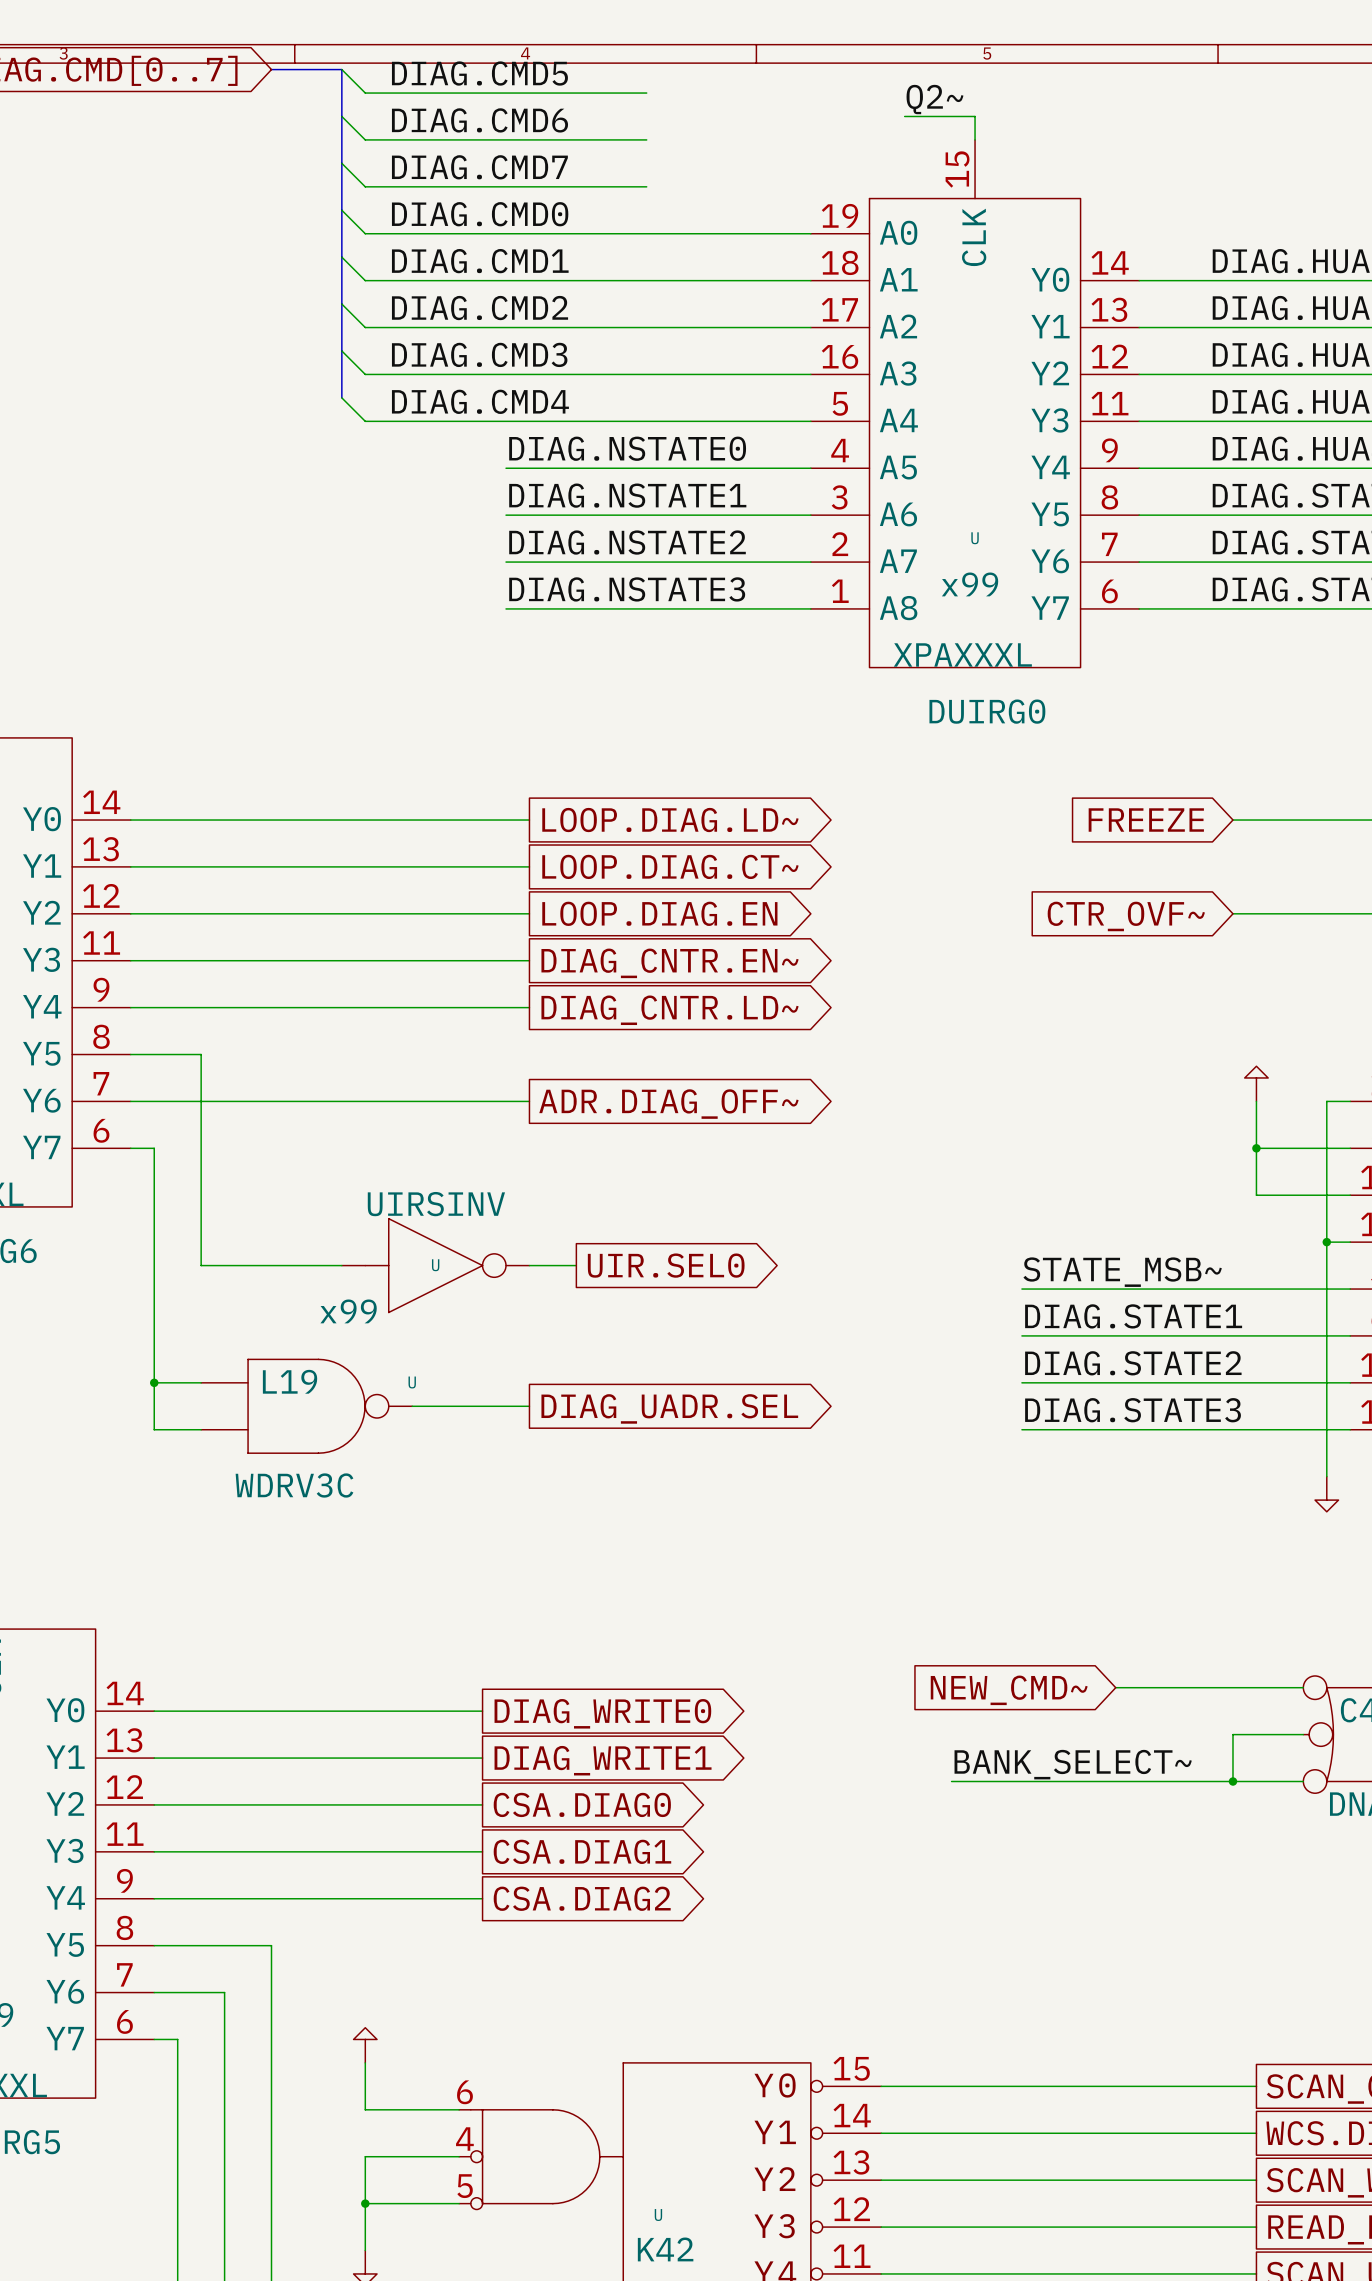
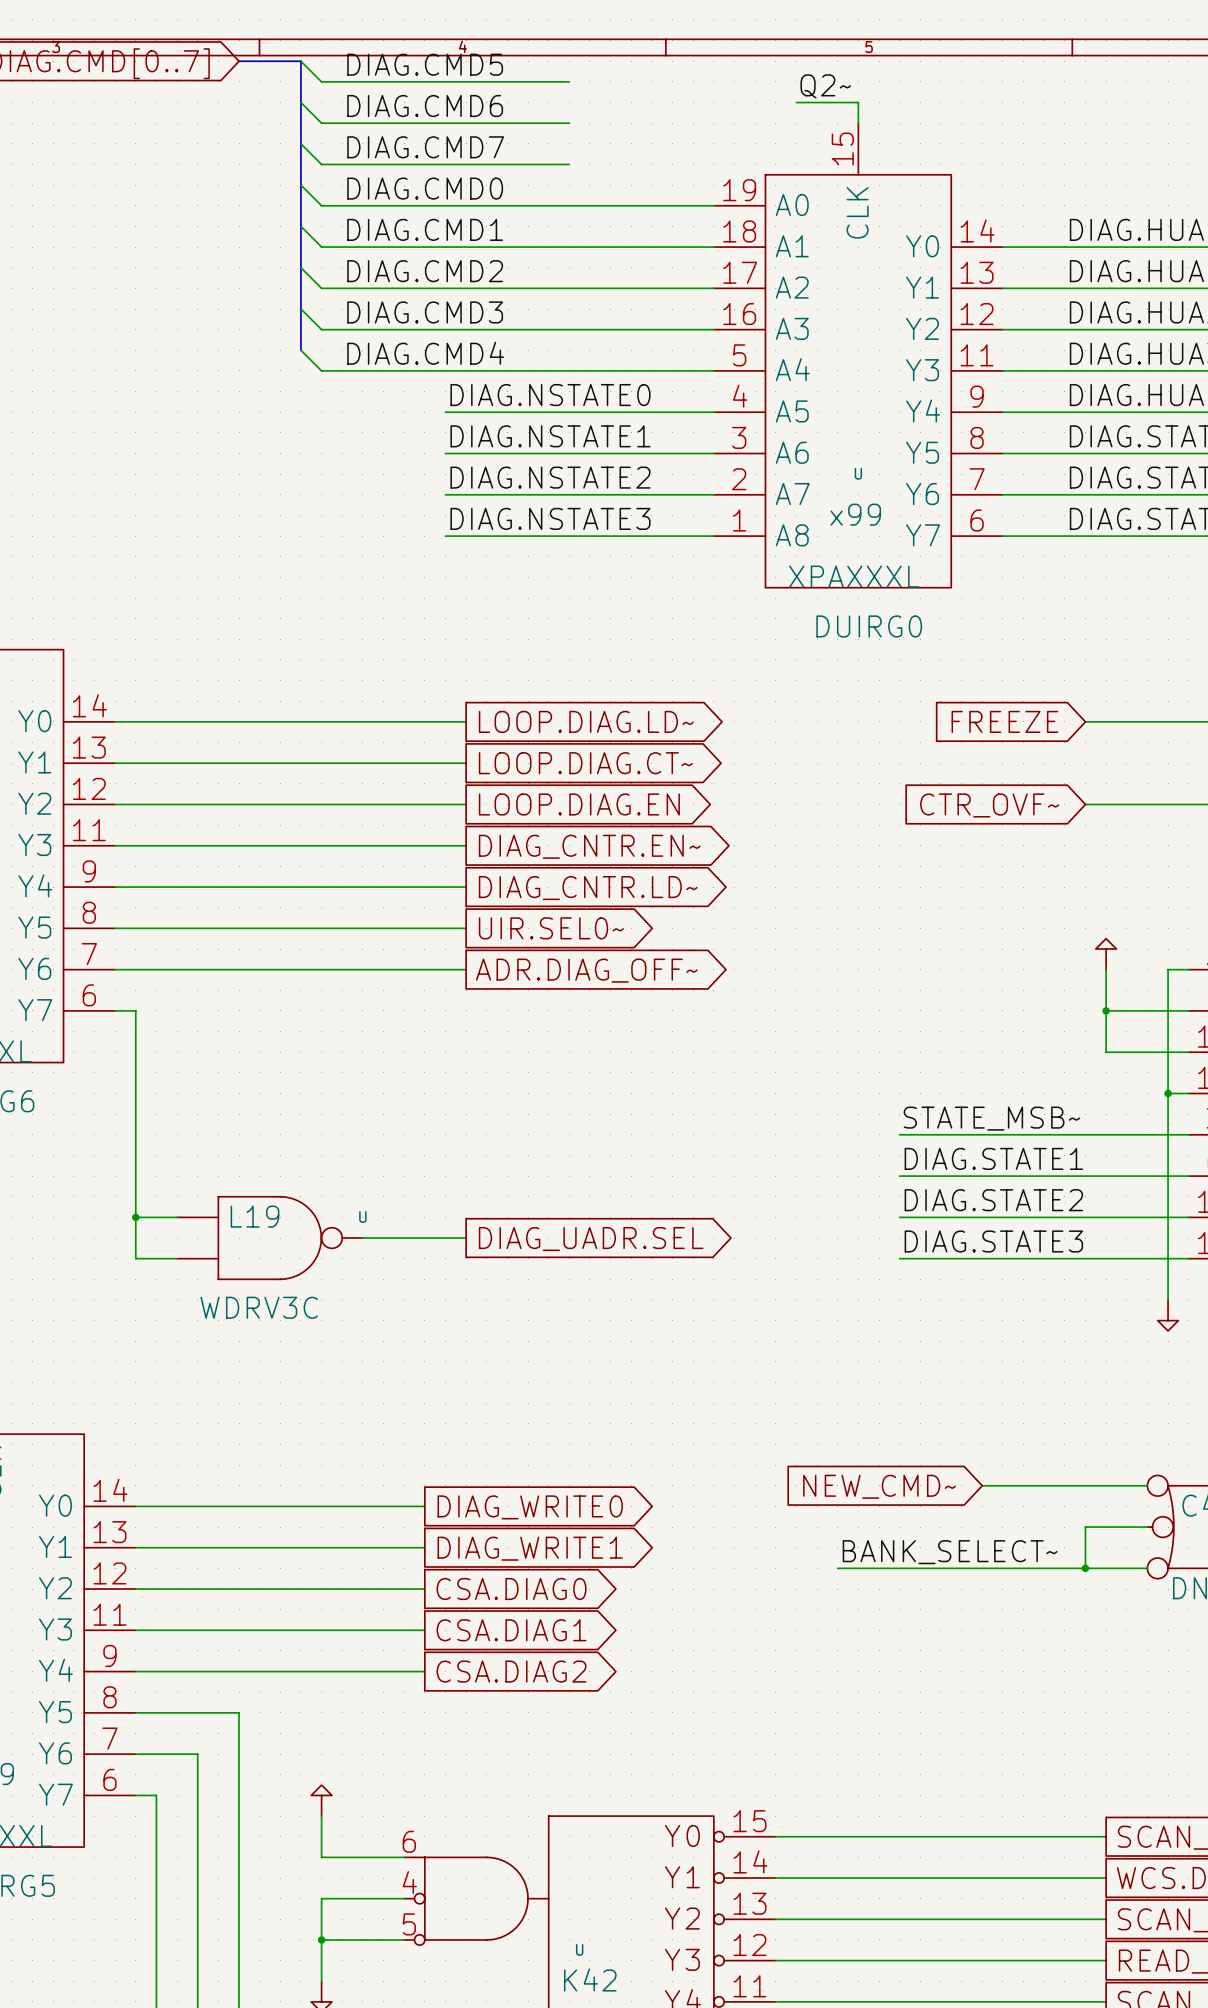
wire: (201, 1054) (201, 1265) (341, 1265) -> (177, 928) (466, 928)
global label: none -> UIR.SEL0~ (551, 928)
U: (435, 1265) -> none
wire: (529, 1265) (576, 1265) -> none
global label: UIR.SEL0 (666, 1265) -> none

